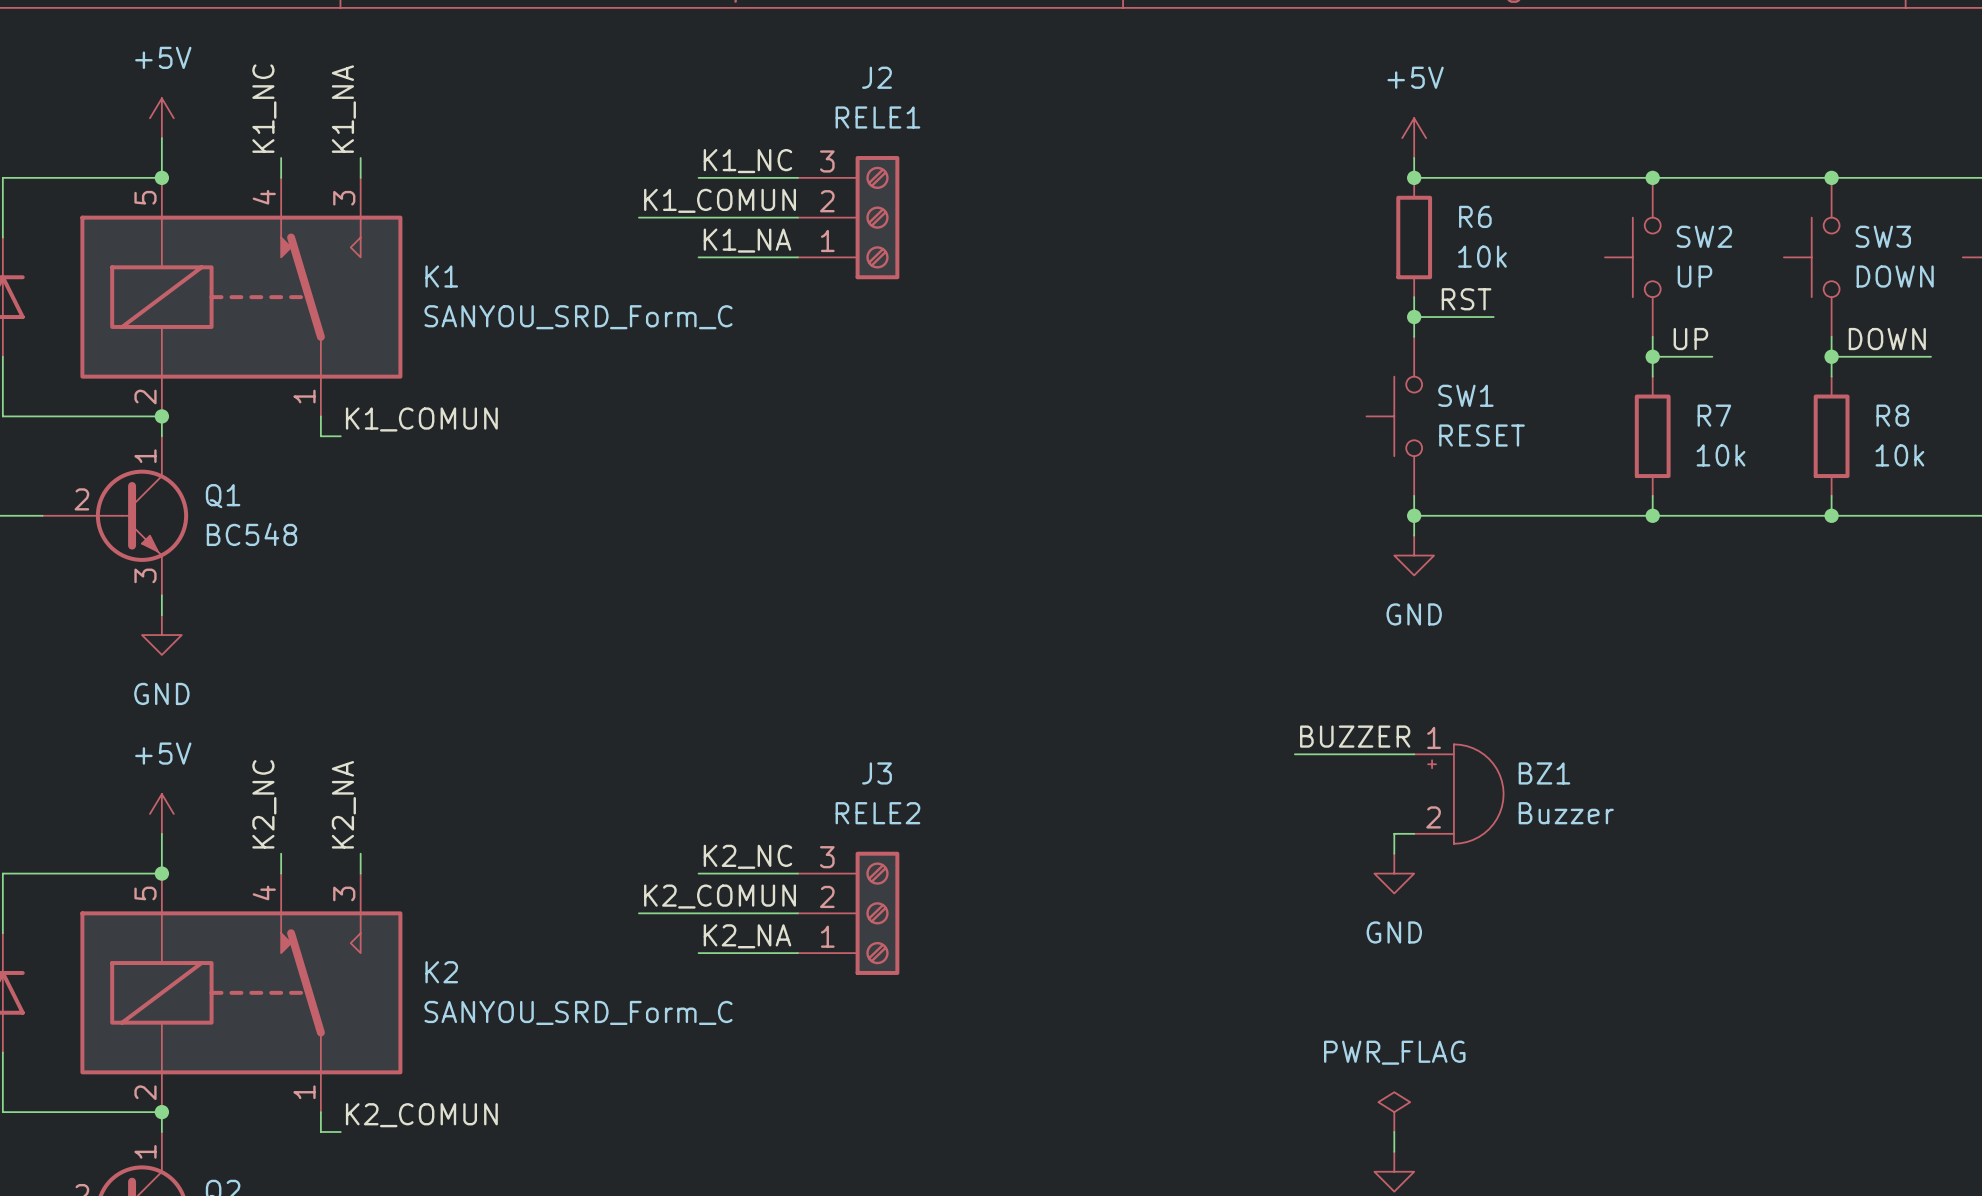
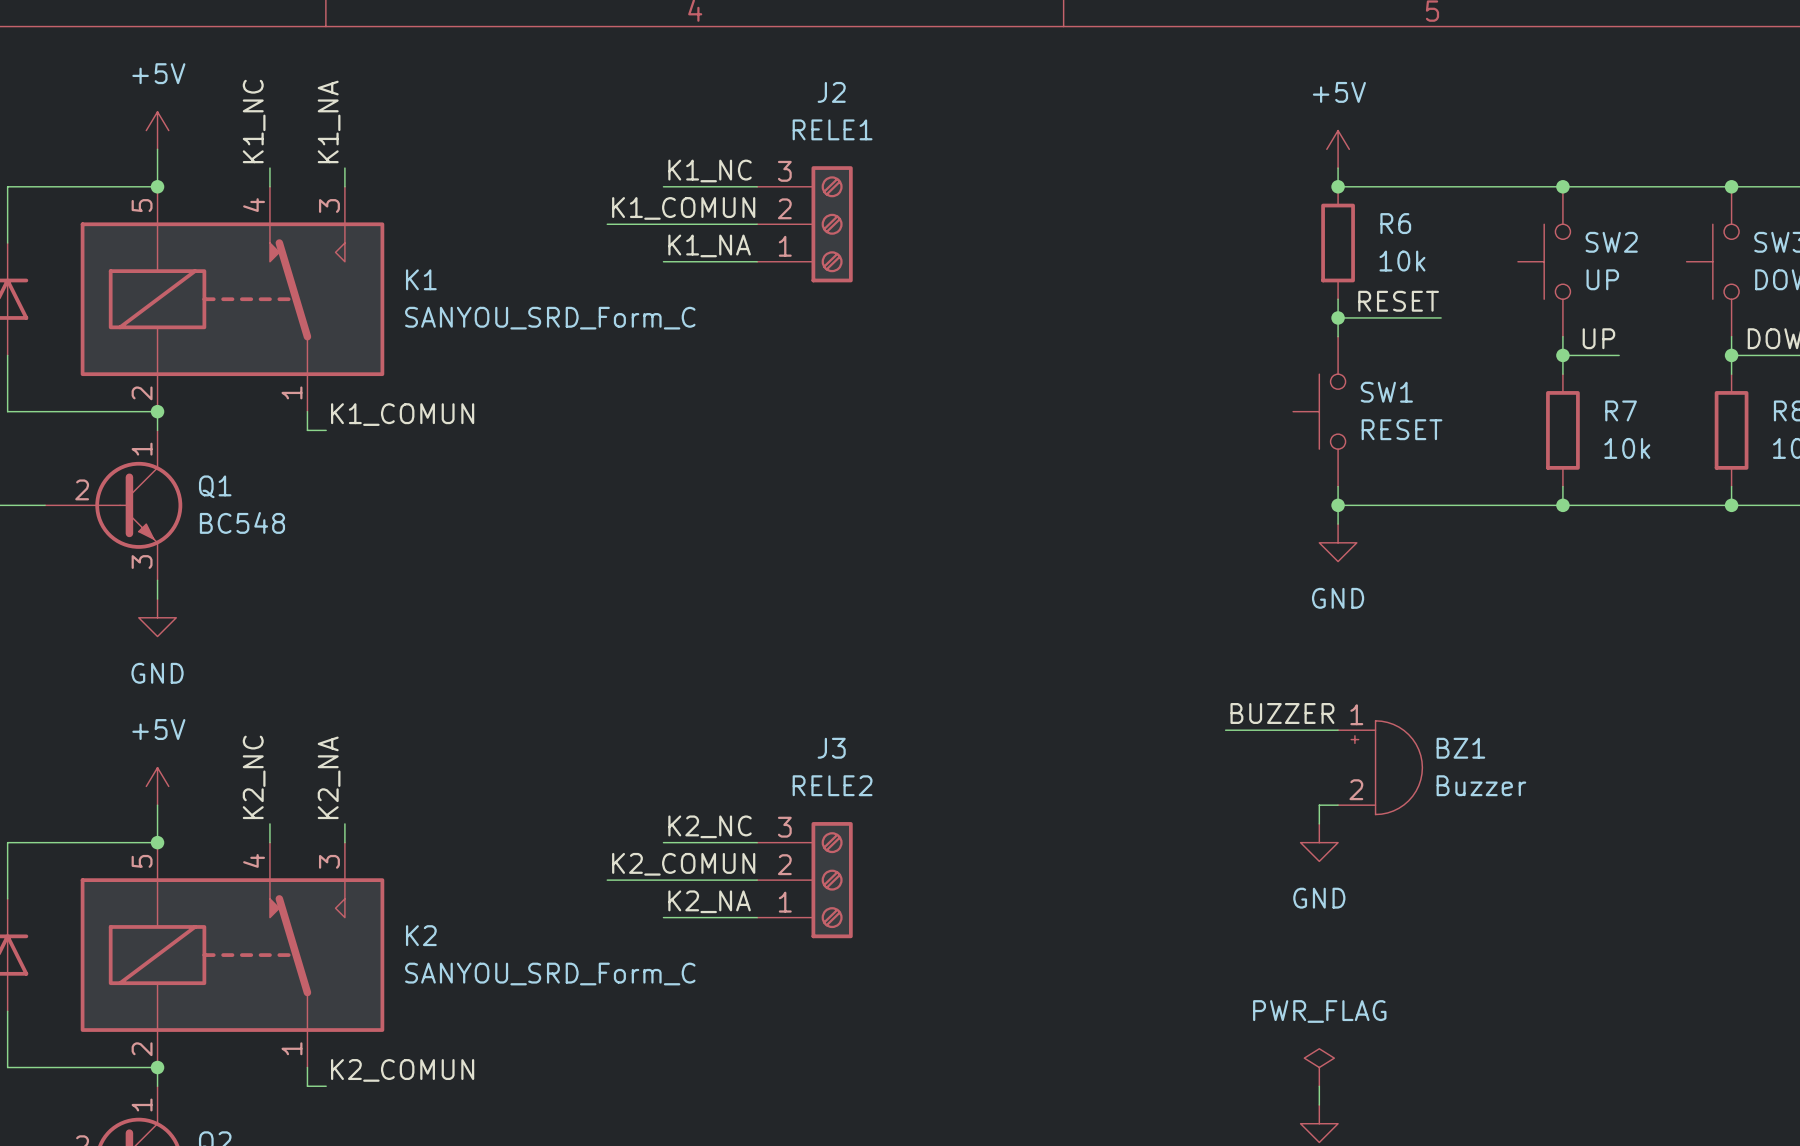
label: RST (1466, 299) -> RESET (1398, 301)
wire: none -> (1413, 317) (1441, 317)

